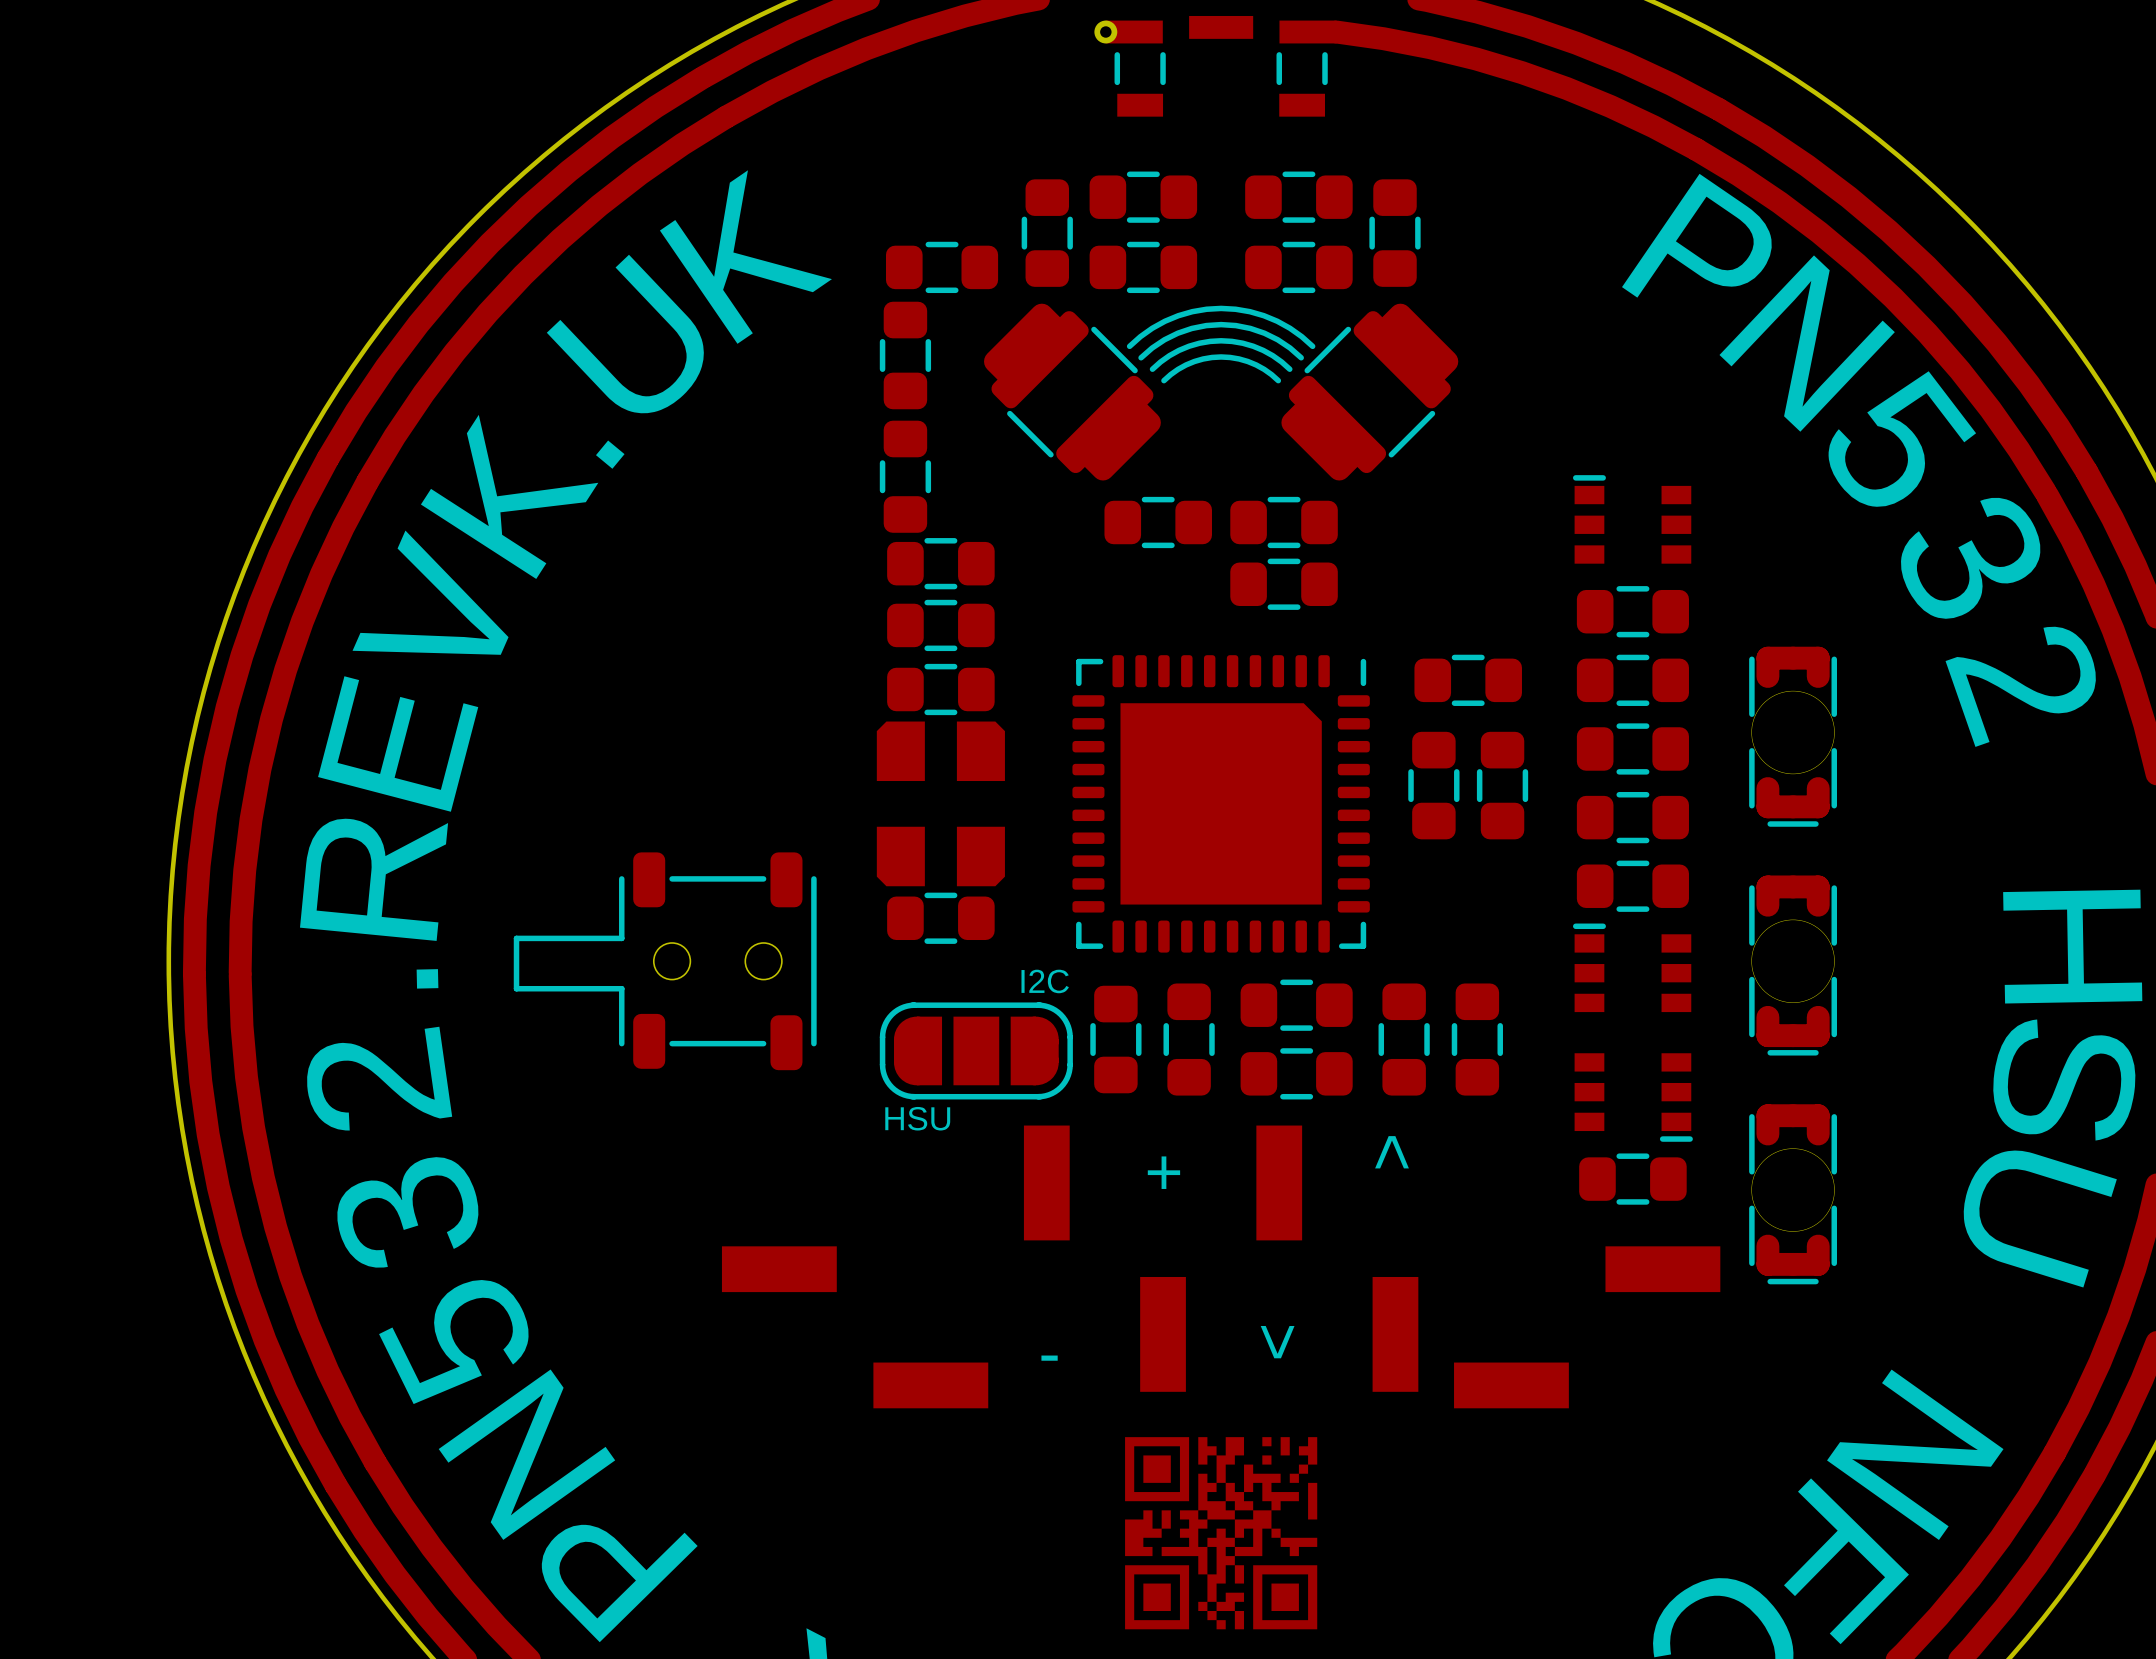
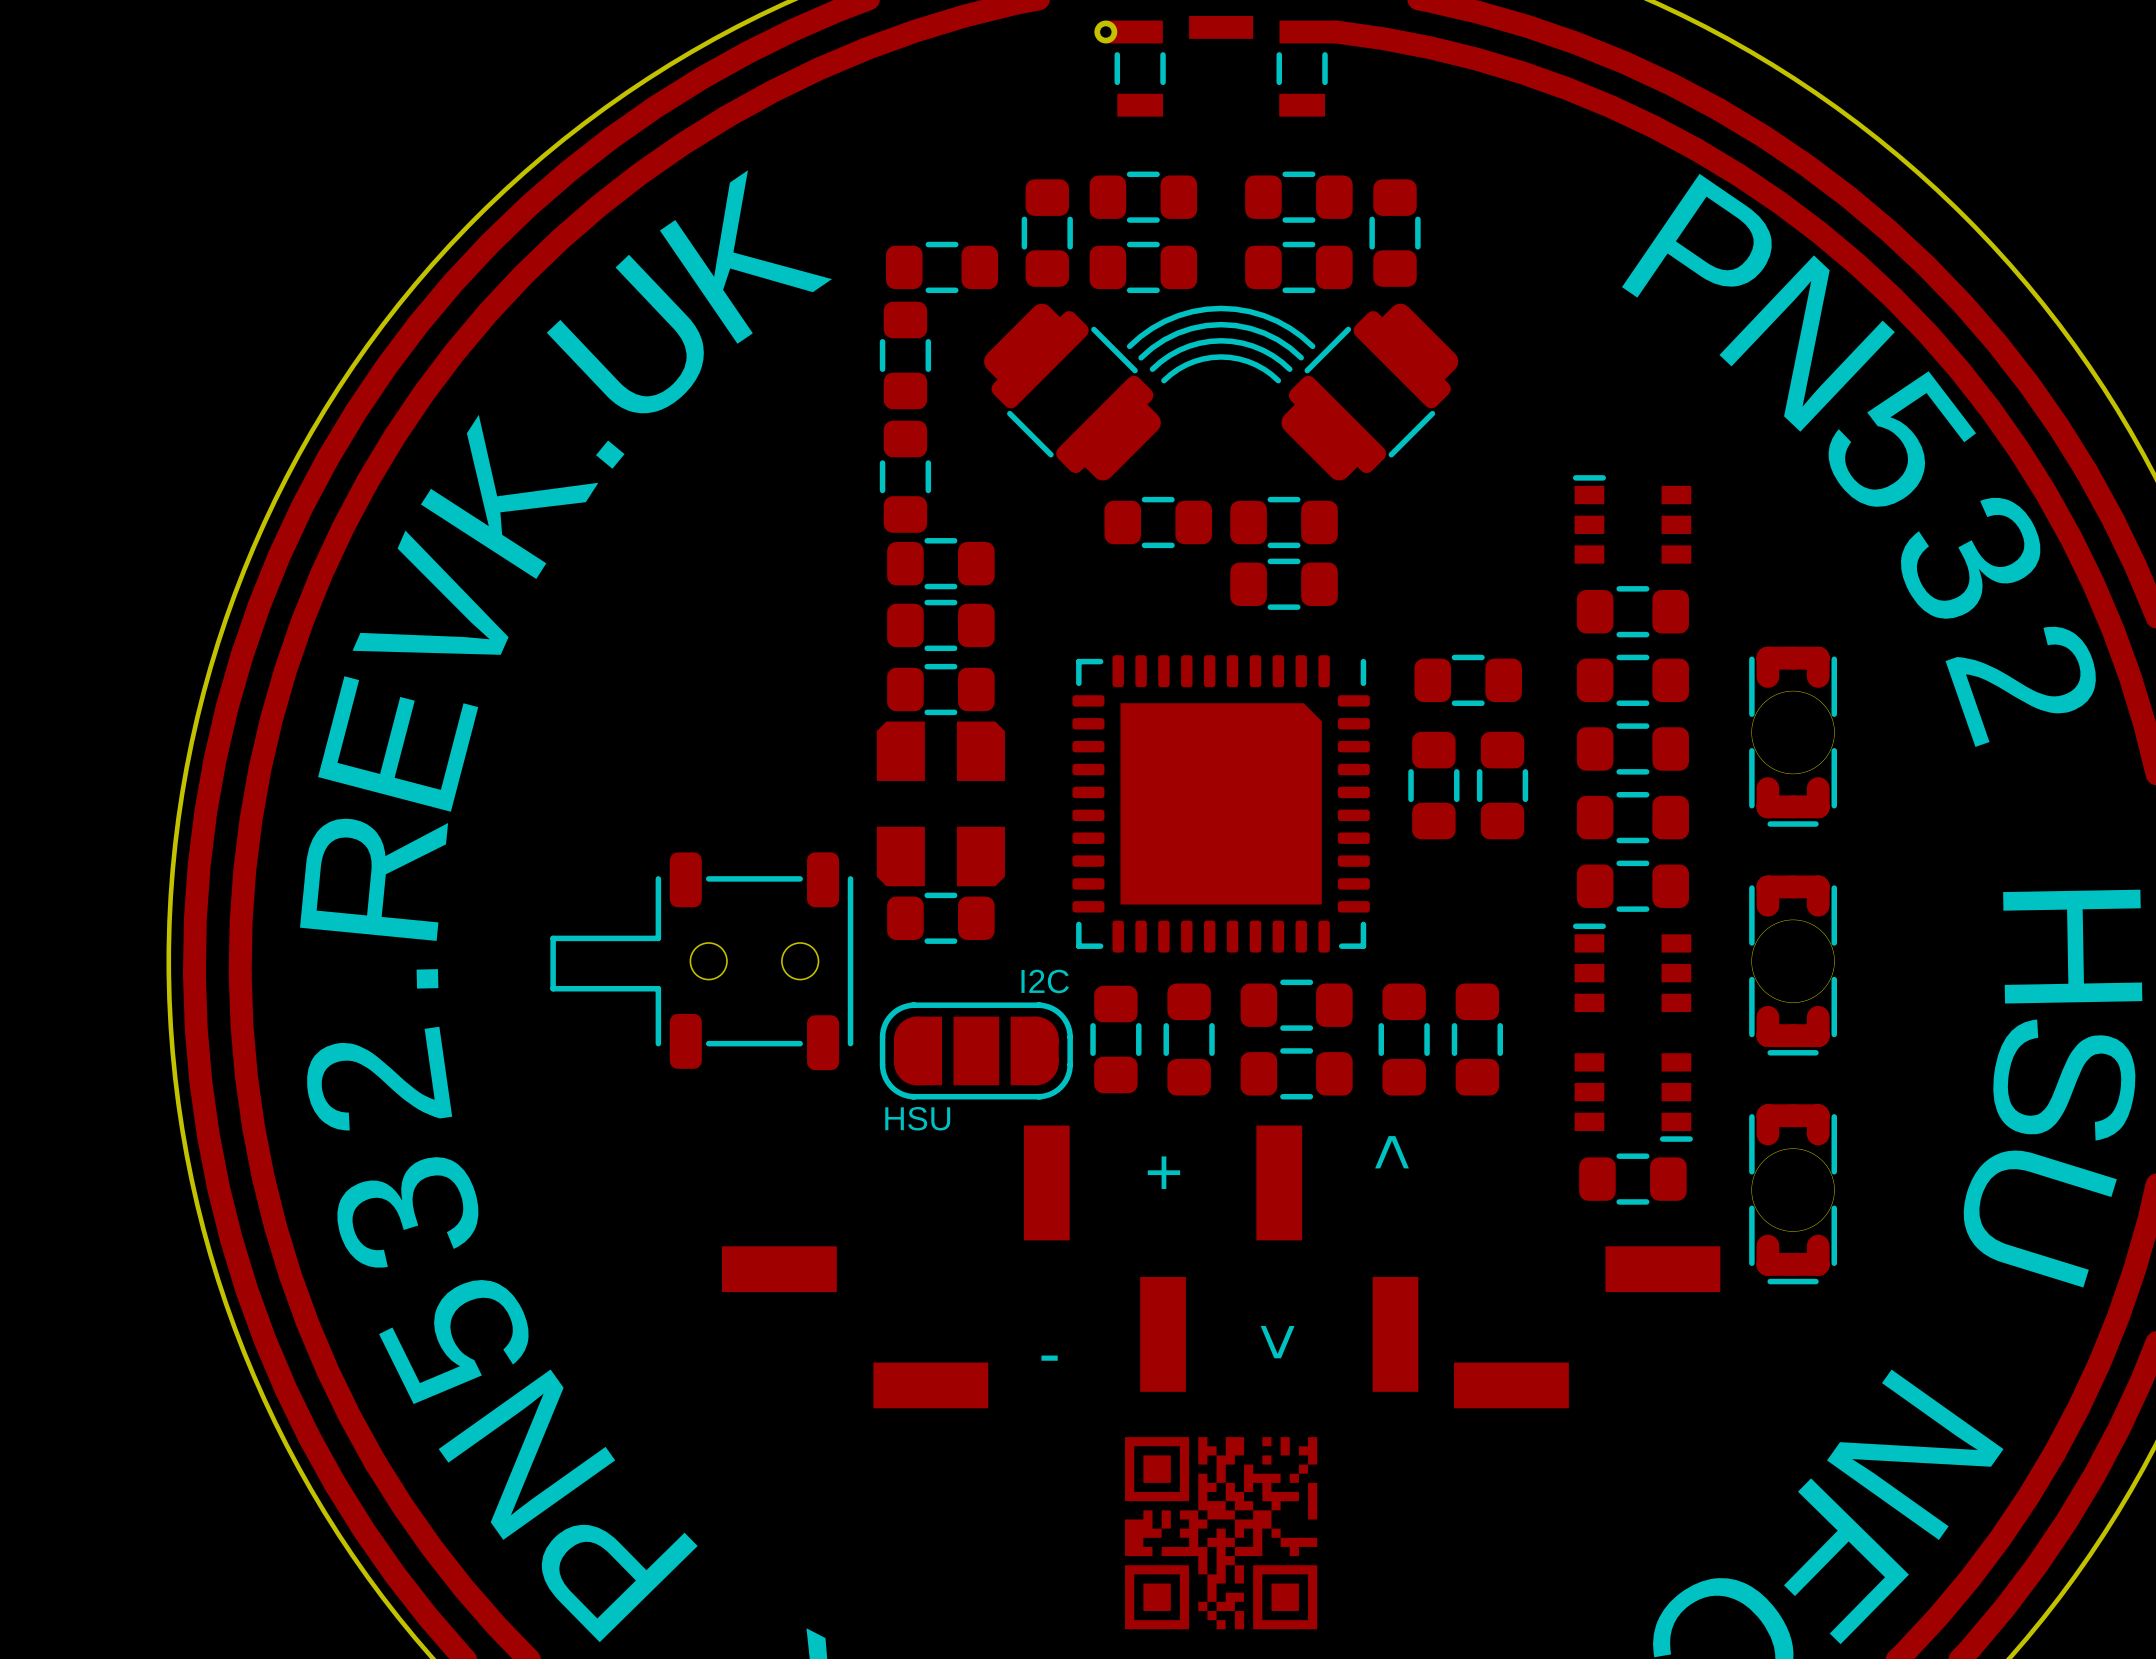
part position: (665, 961) -> (701, 961)

